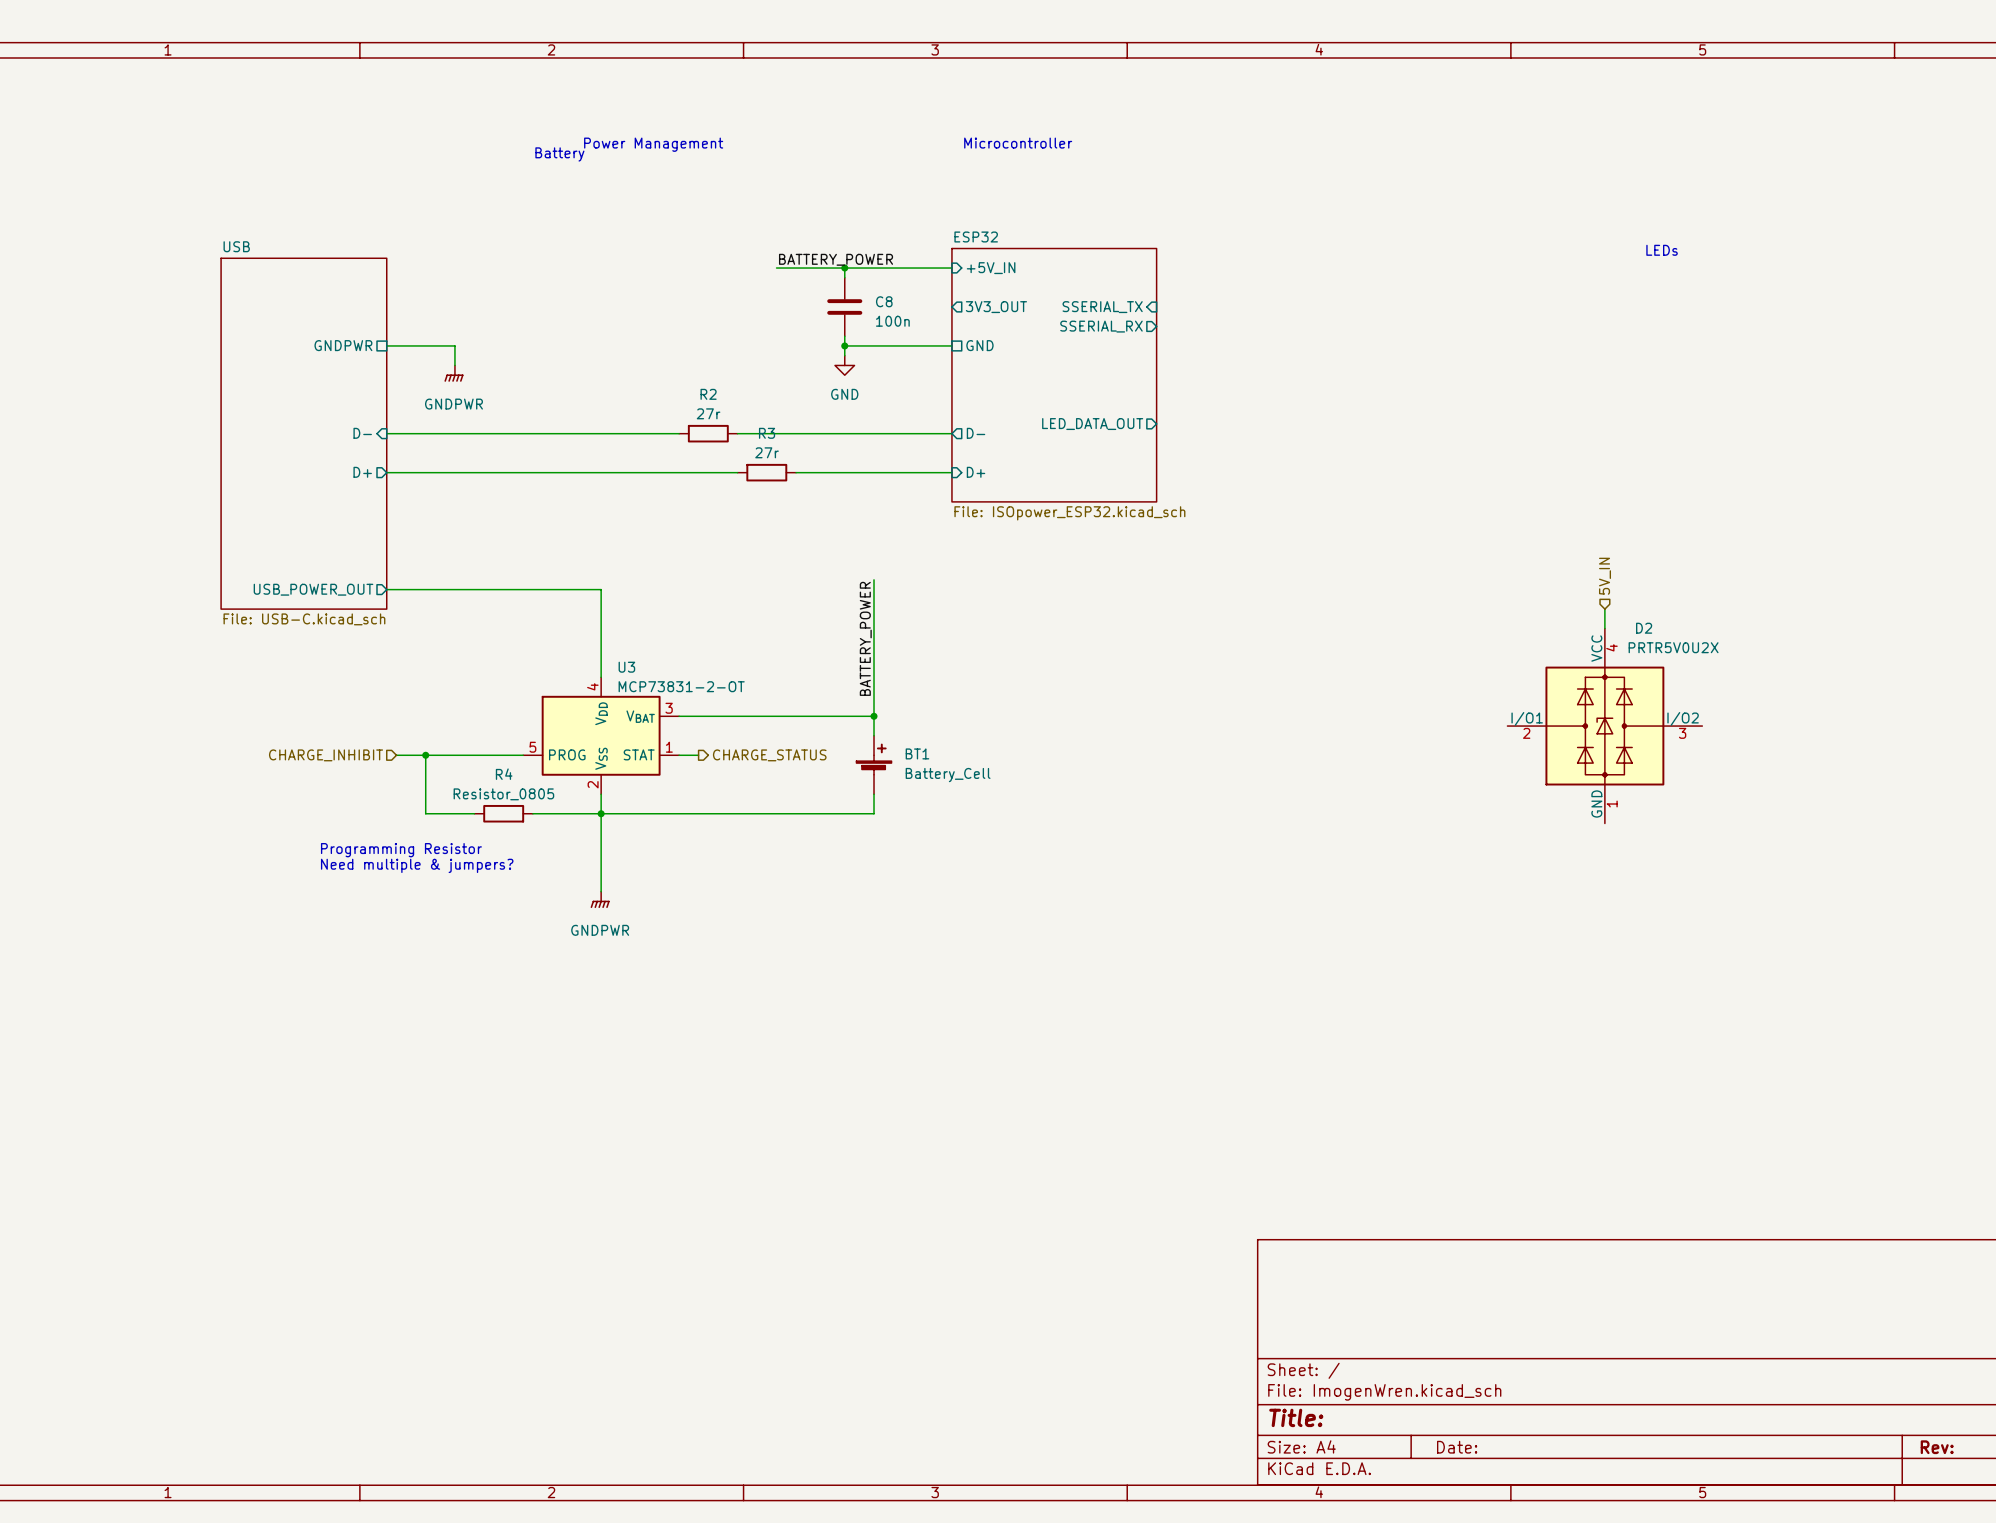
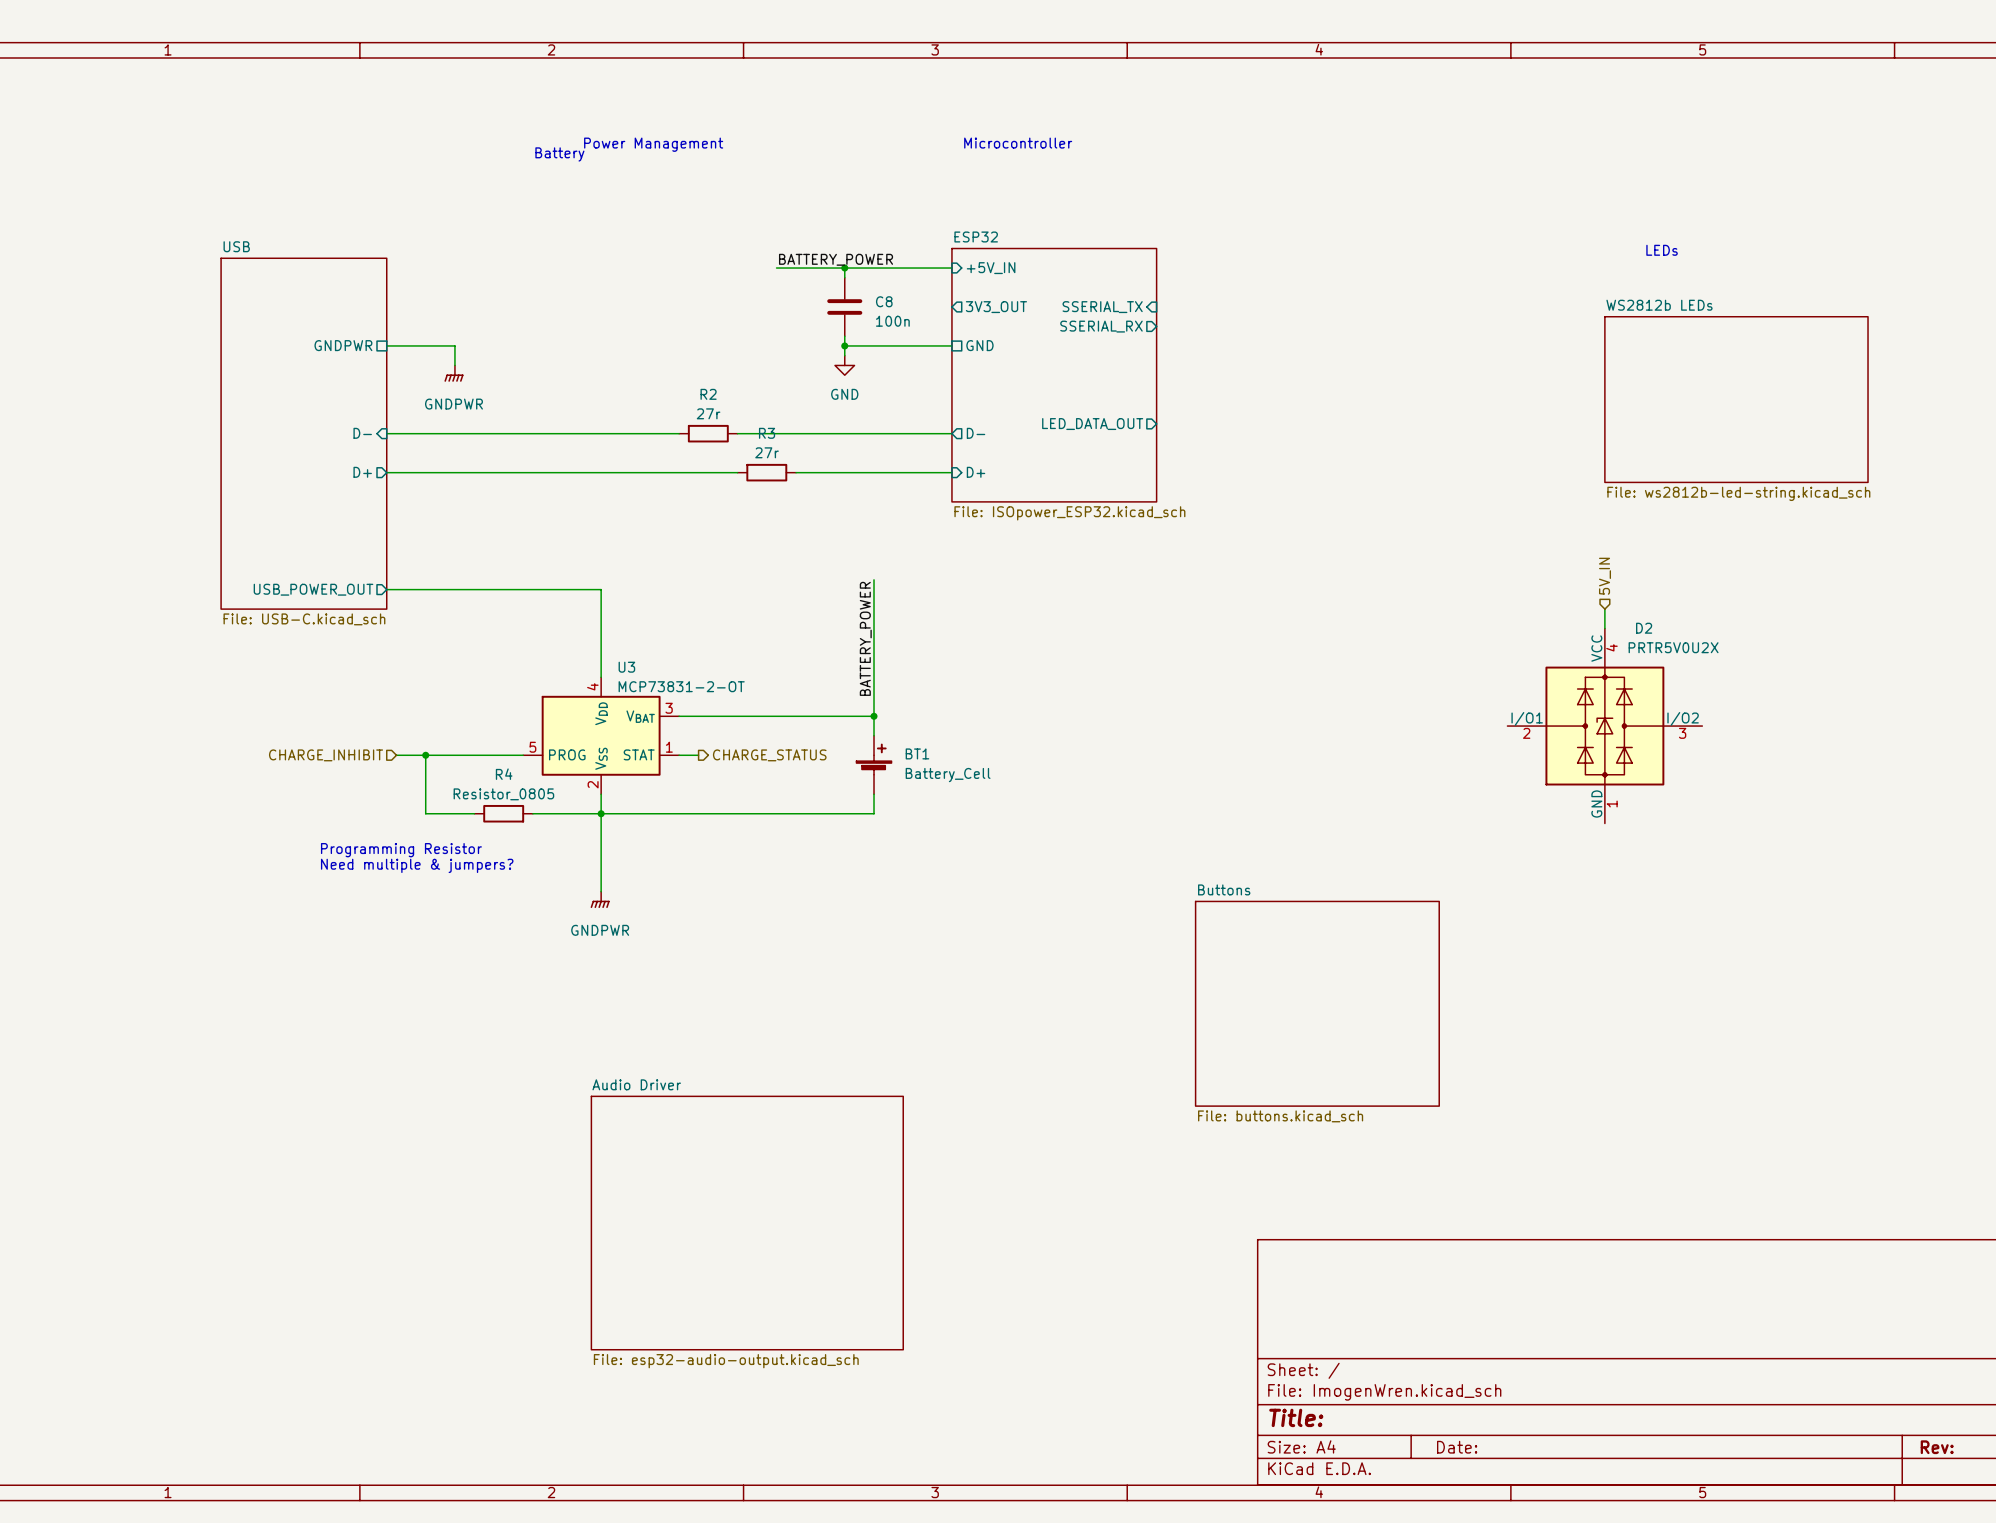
sheet WS2812b LEDs: none -> File: ws2812b-led-string.kicad_sch (1736, 399)
sheet Buttons: none -> File: buttons.kicad_sch (1317, 1003)
sheet Audio Driver: none -> File: esp32-audio-output.kicad_sch (747, 1223)

